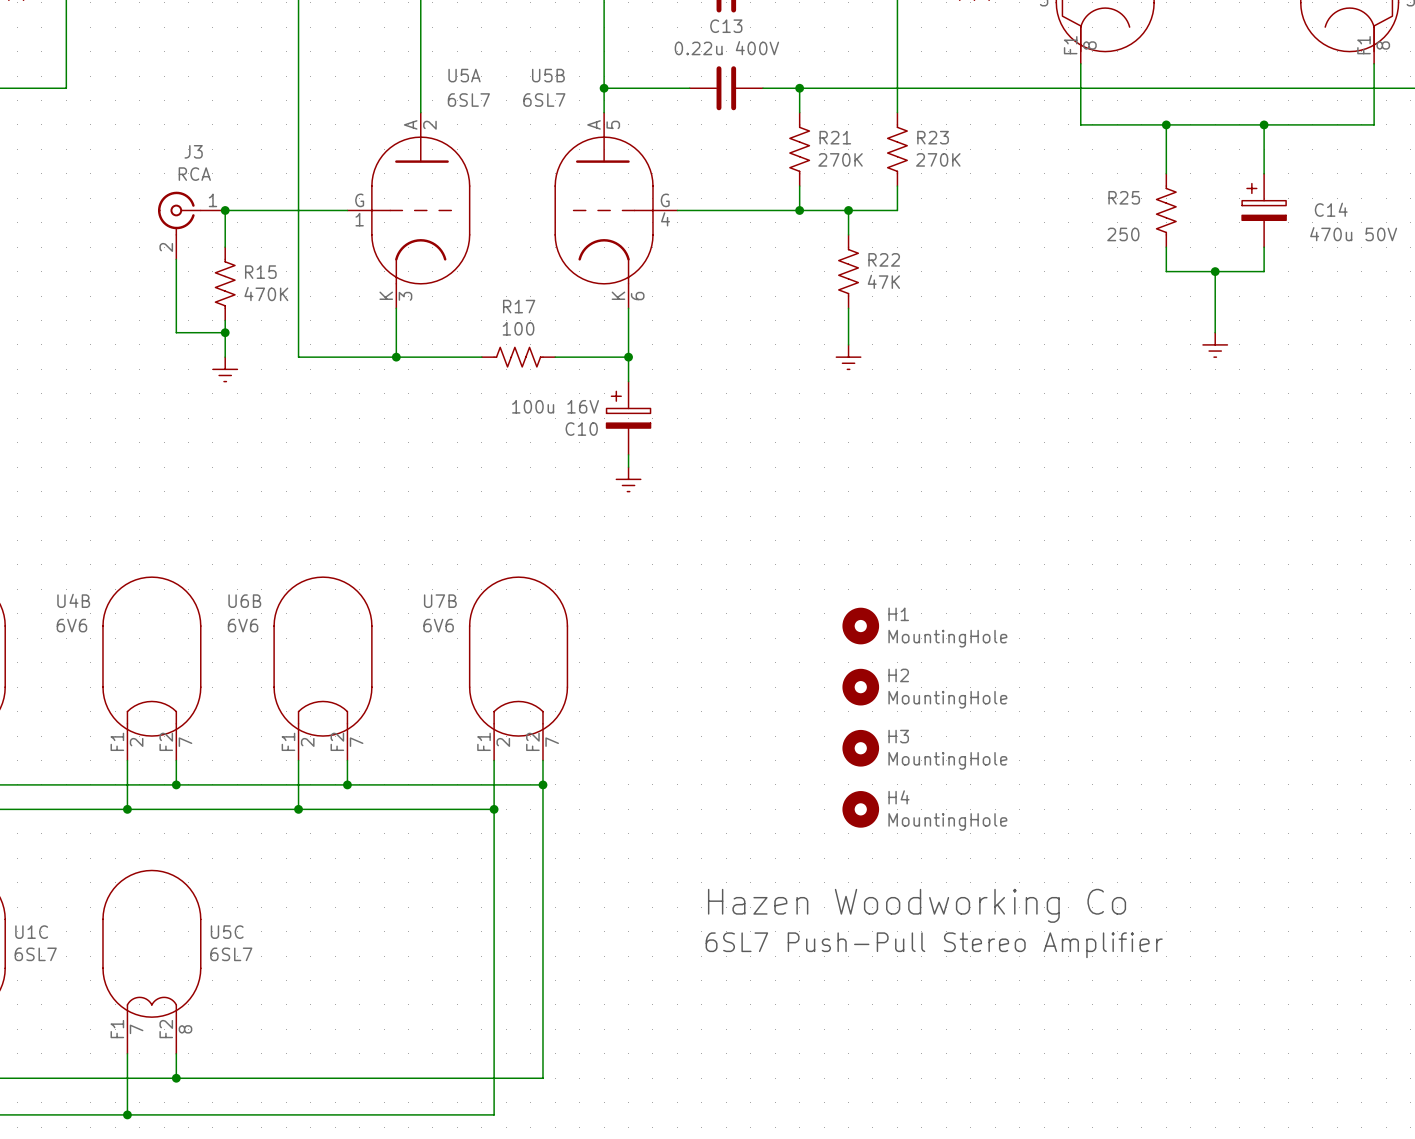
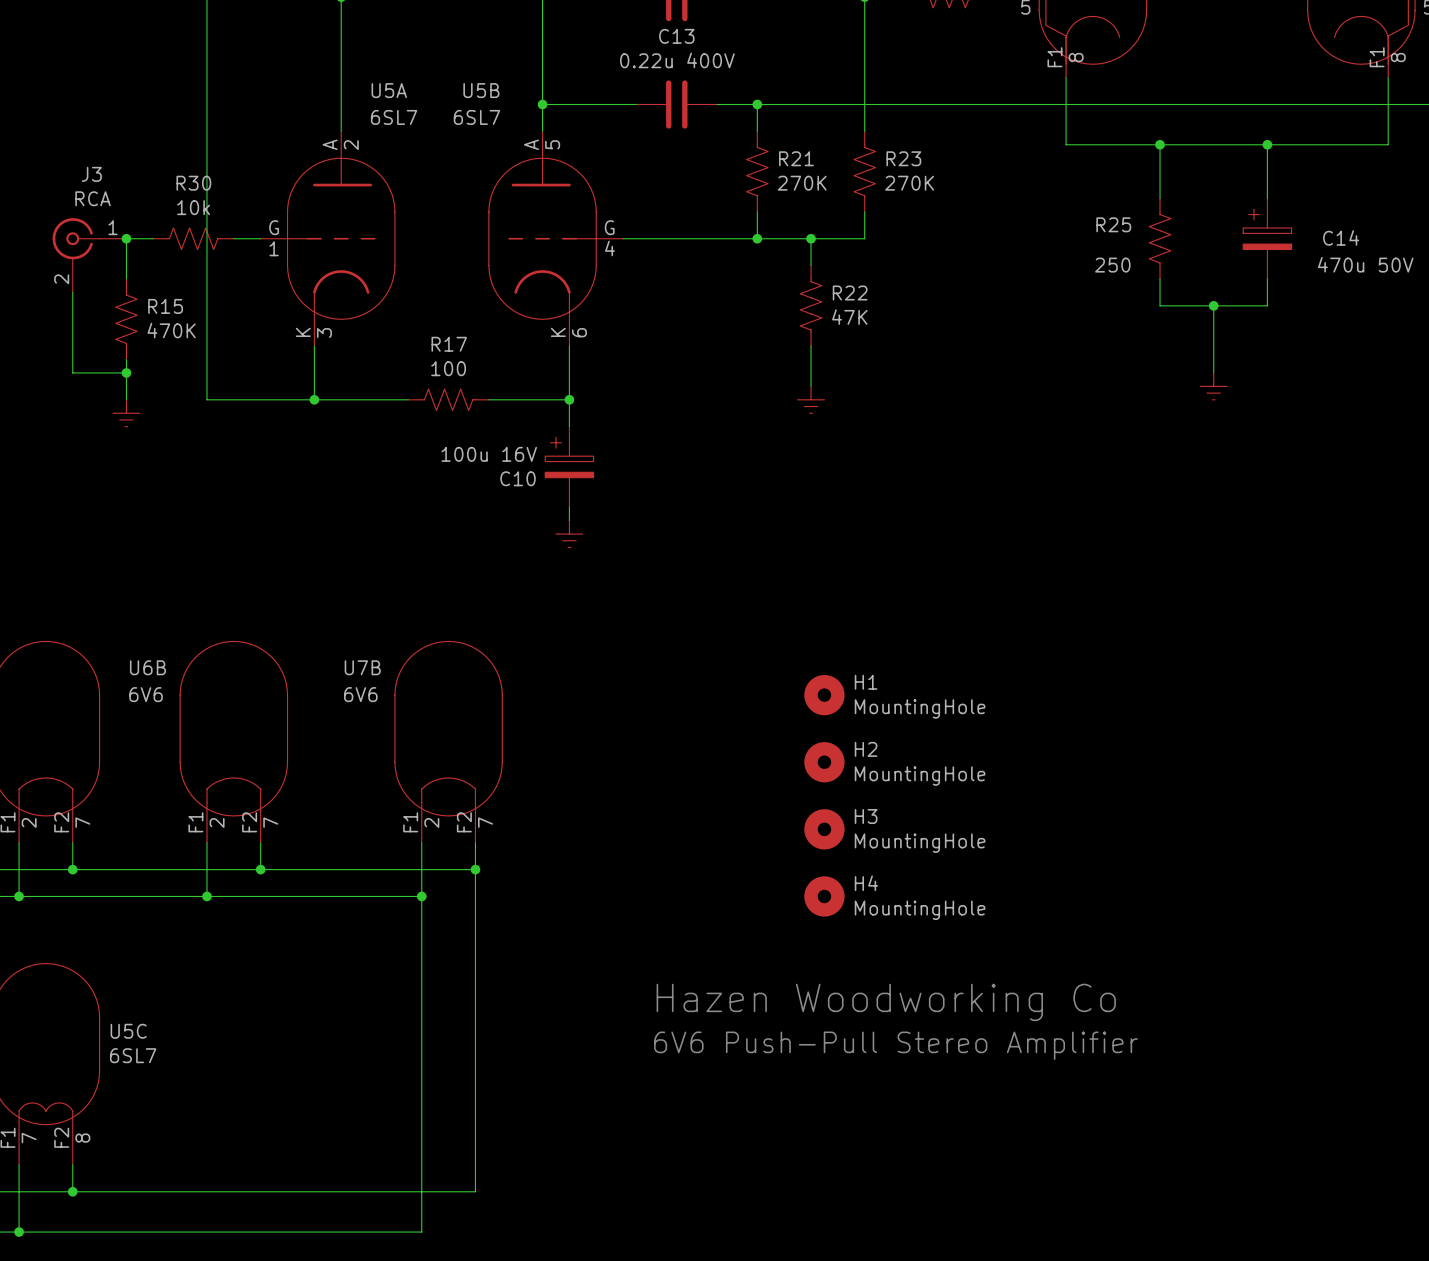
R30: none -> 10k (193, 238)
text: 6SL7 Push-Pull Stereo Amplifier (934, 945) -> 6V6 Push-Pull Stereo Amplifier (895, 1045)

